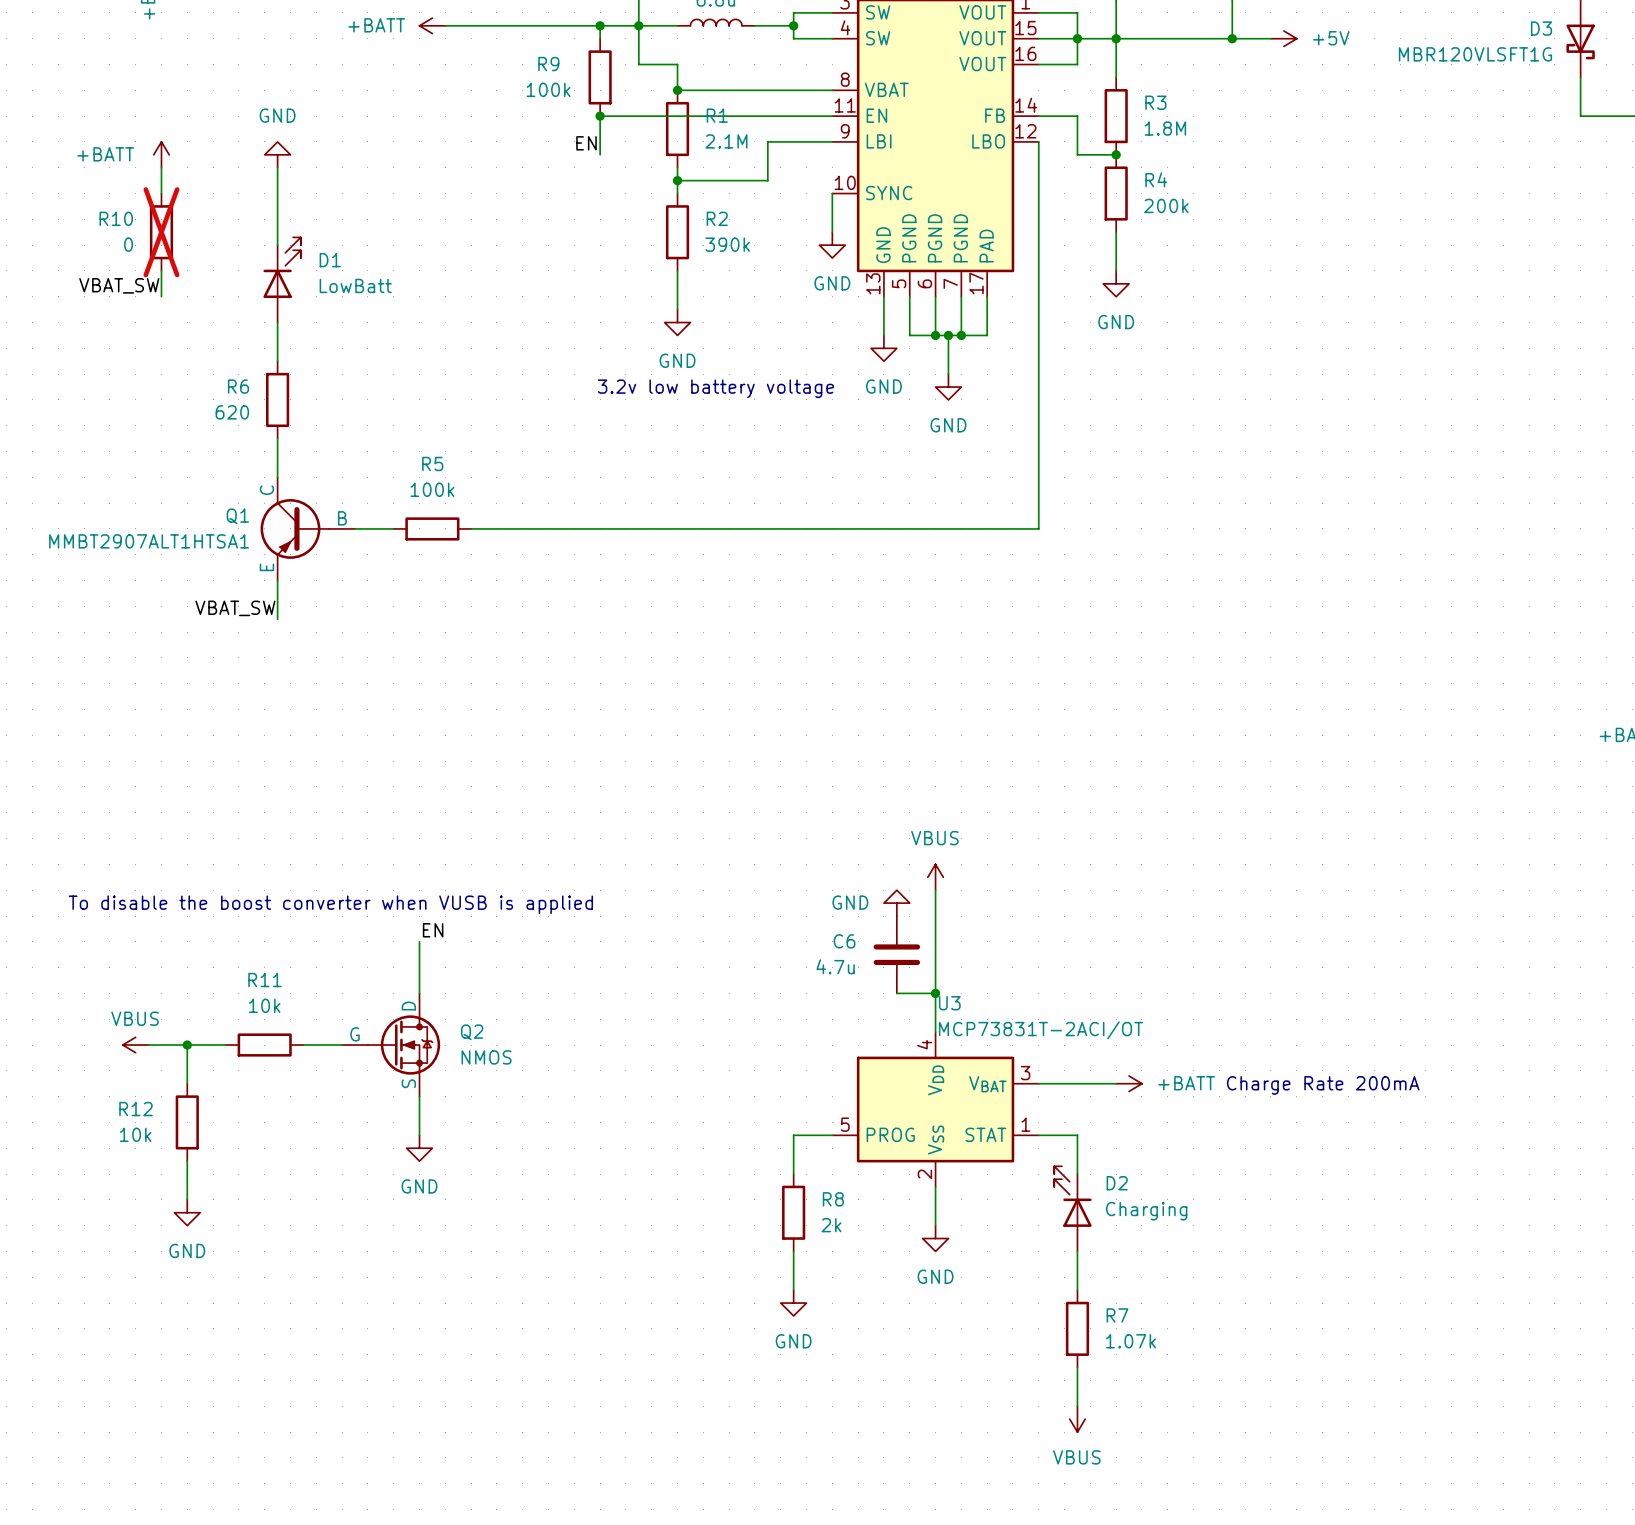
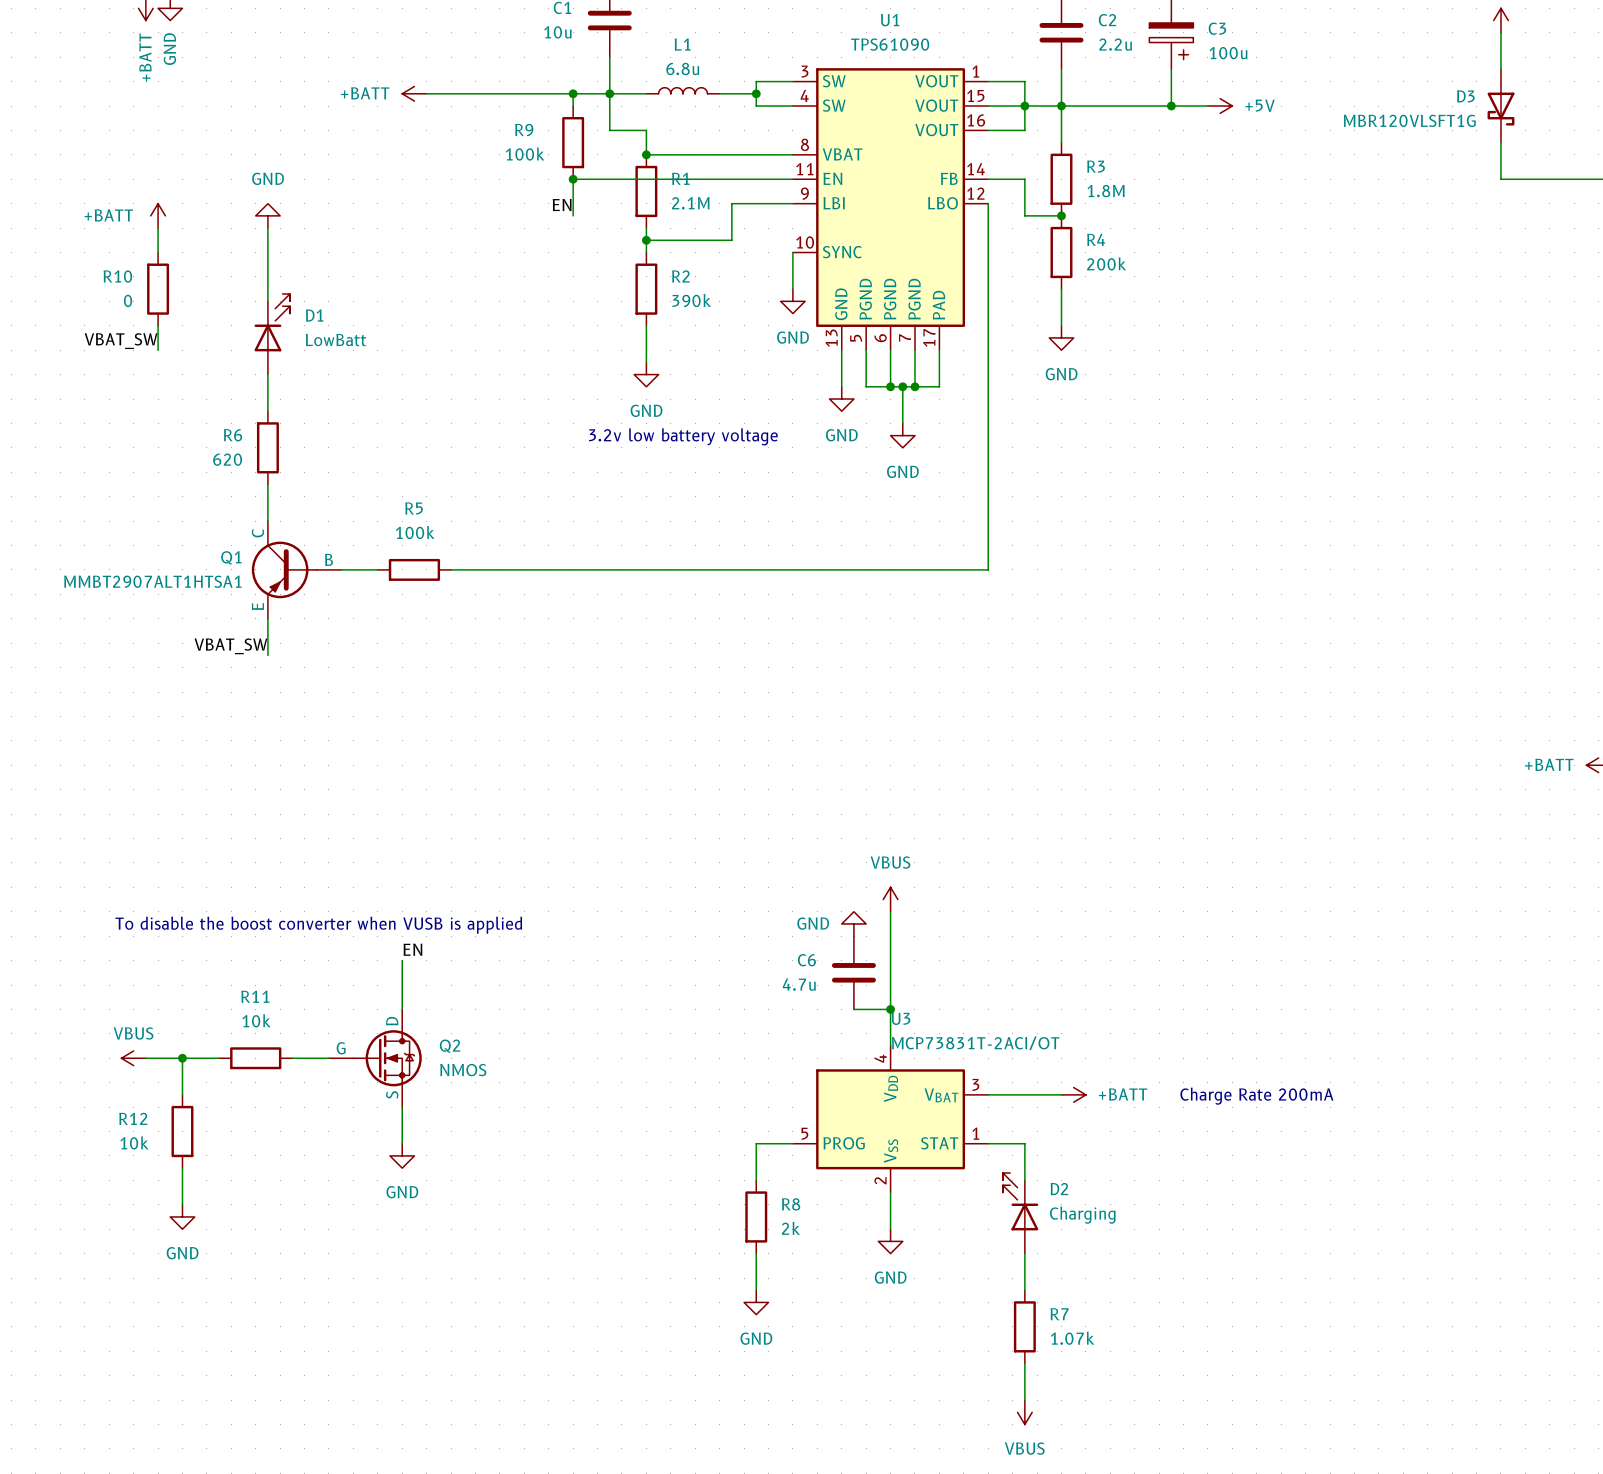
R10 do-not-place cross: (161, 232) -> none

